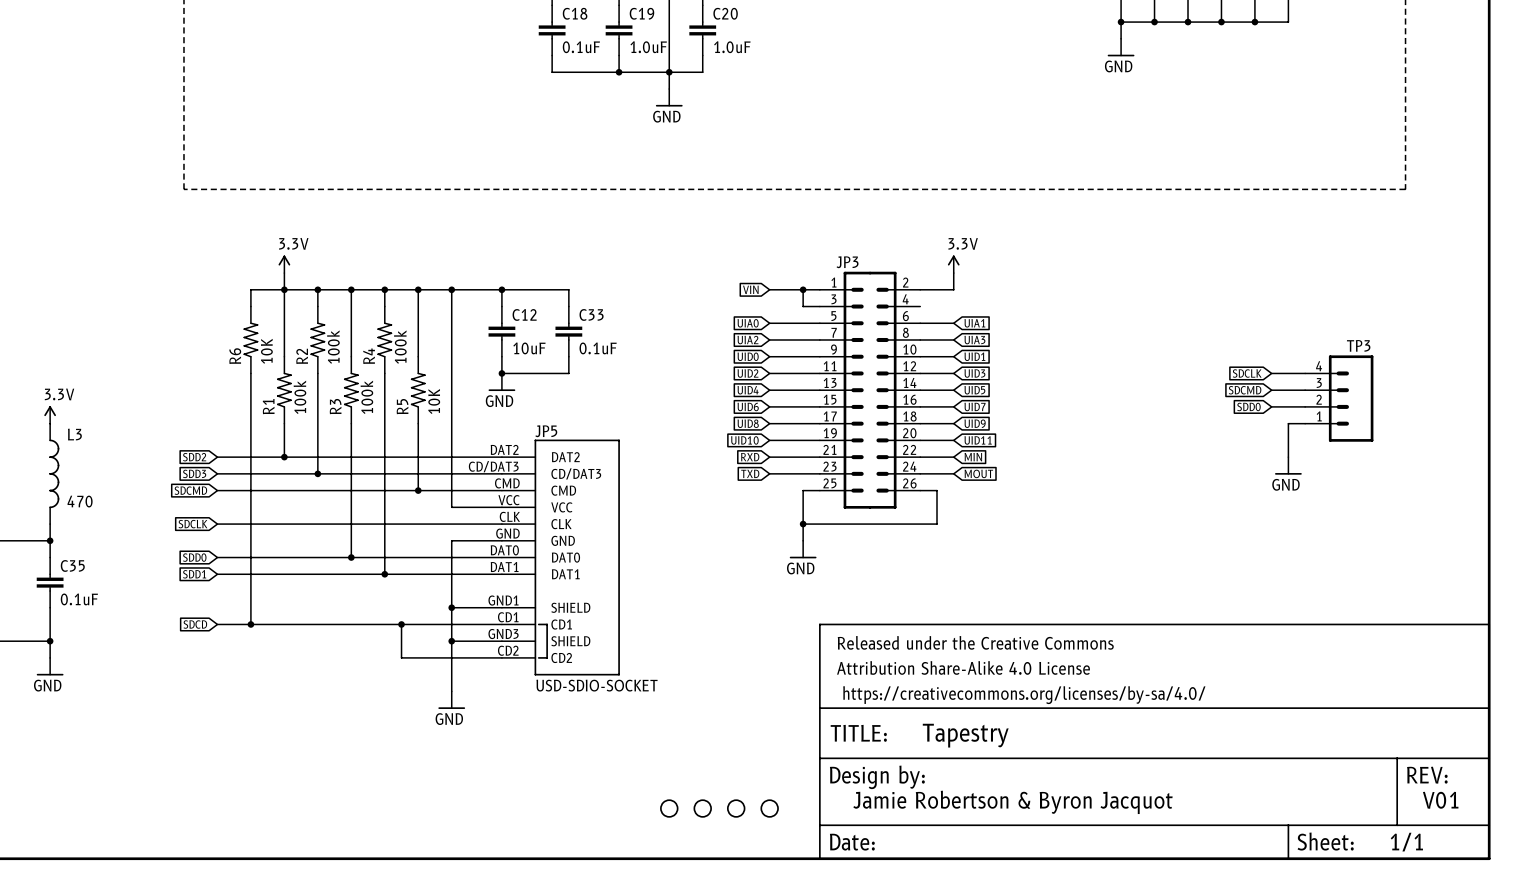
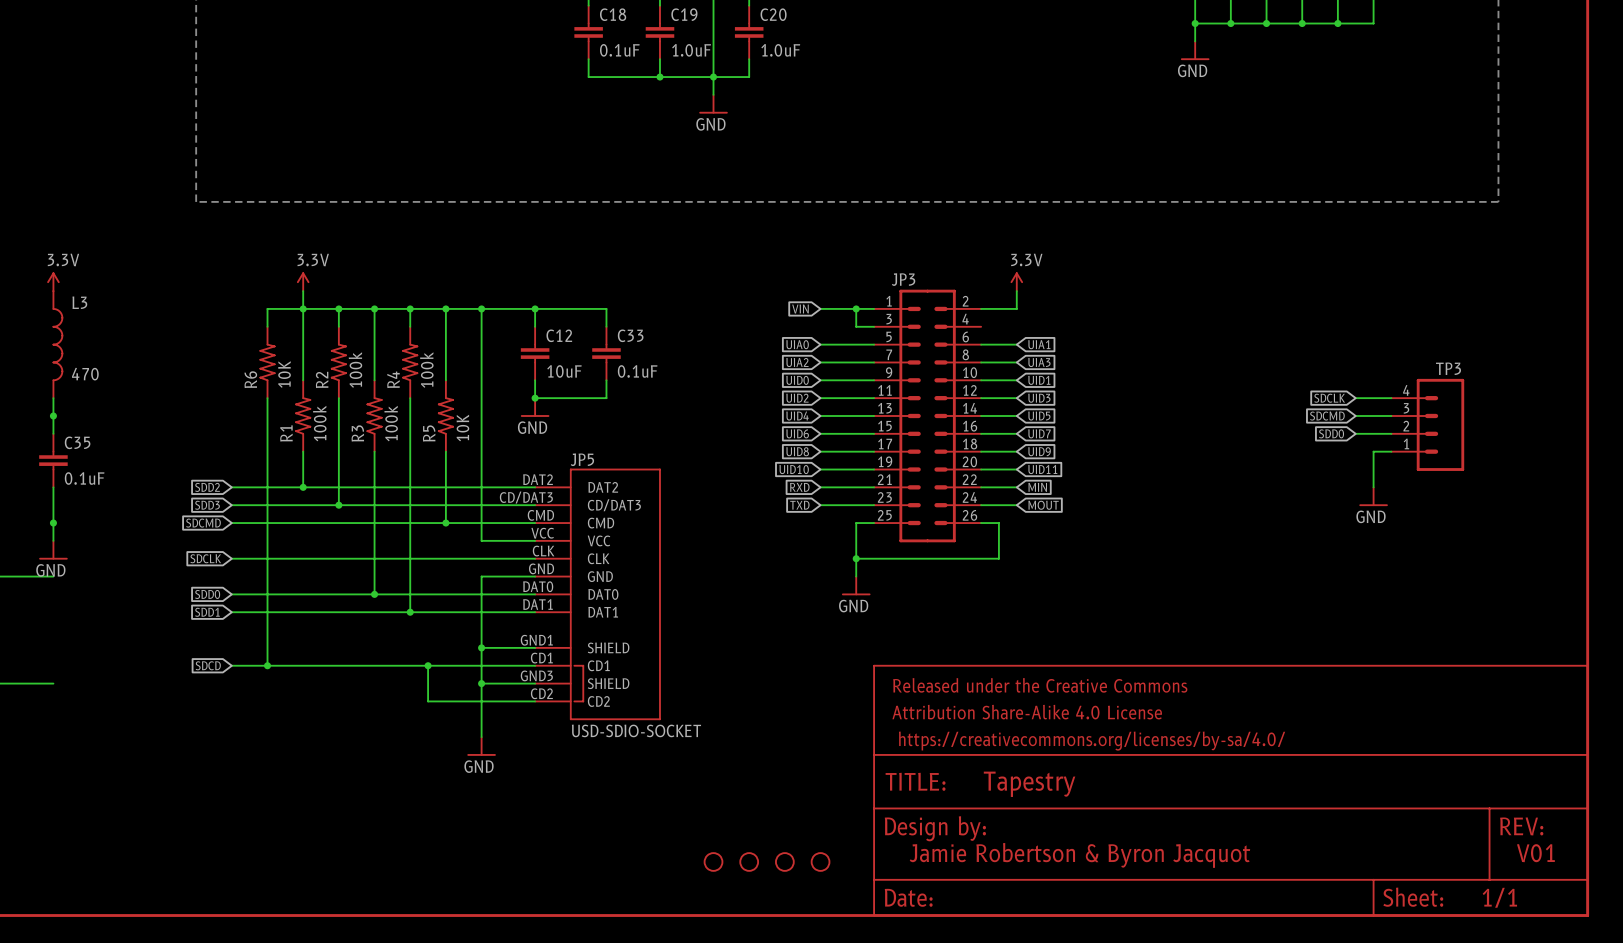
junction: none -> (53, 415)
power symbol position: 3.3V (50, 414) -> 3.3V (53, 281)
L3 position: (54, 473) -> (57, 344)
junction: none -> (53, 523)
power symbol: none -> GND (53, 550)
wire: (50, 524) (50, 557) -> (53, 398) (53, 433)
junction: (50, 540) -> none
C35 position: (50, 582) -> (53, 460)
wire: (50, 607) (50, 657) -> (53, 487) (53, 540)
junction: (50, 641) -> none
power symbol: GND (50, 666) -> none

